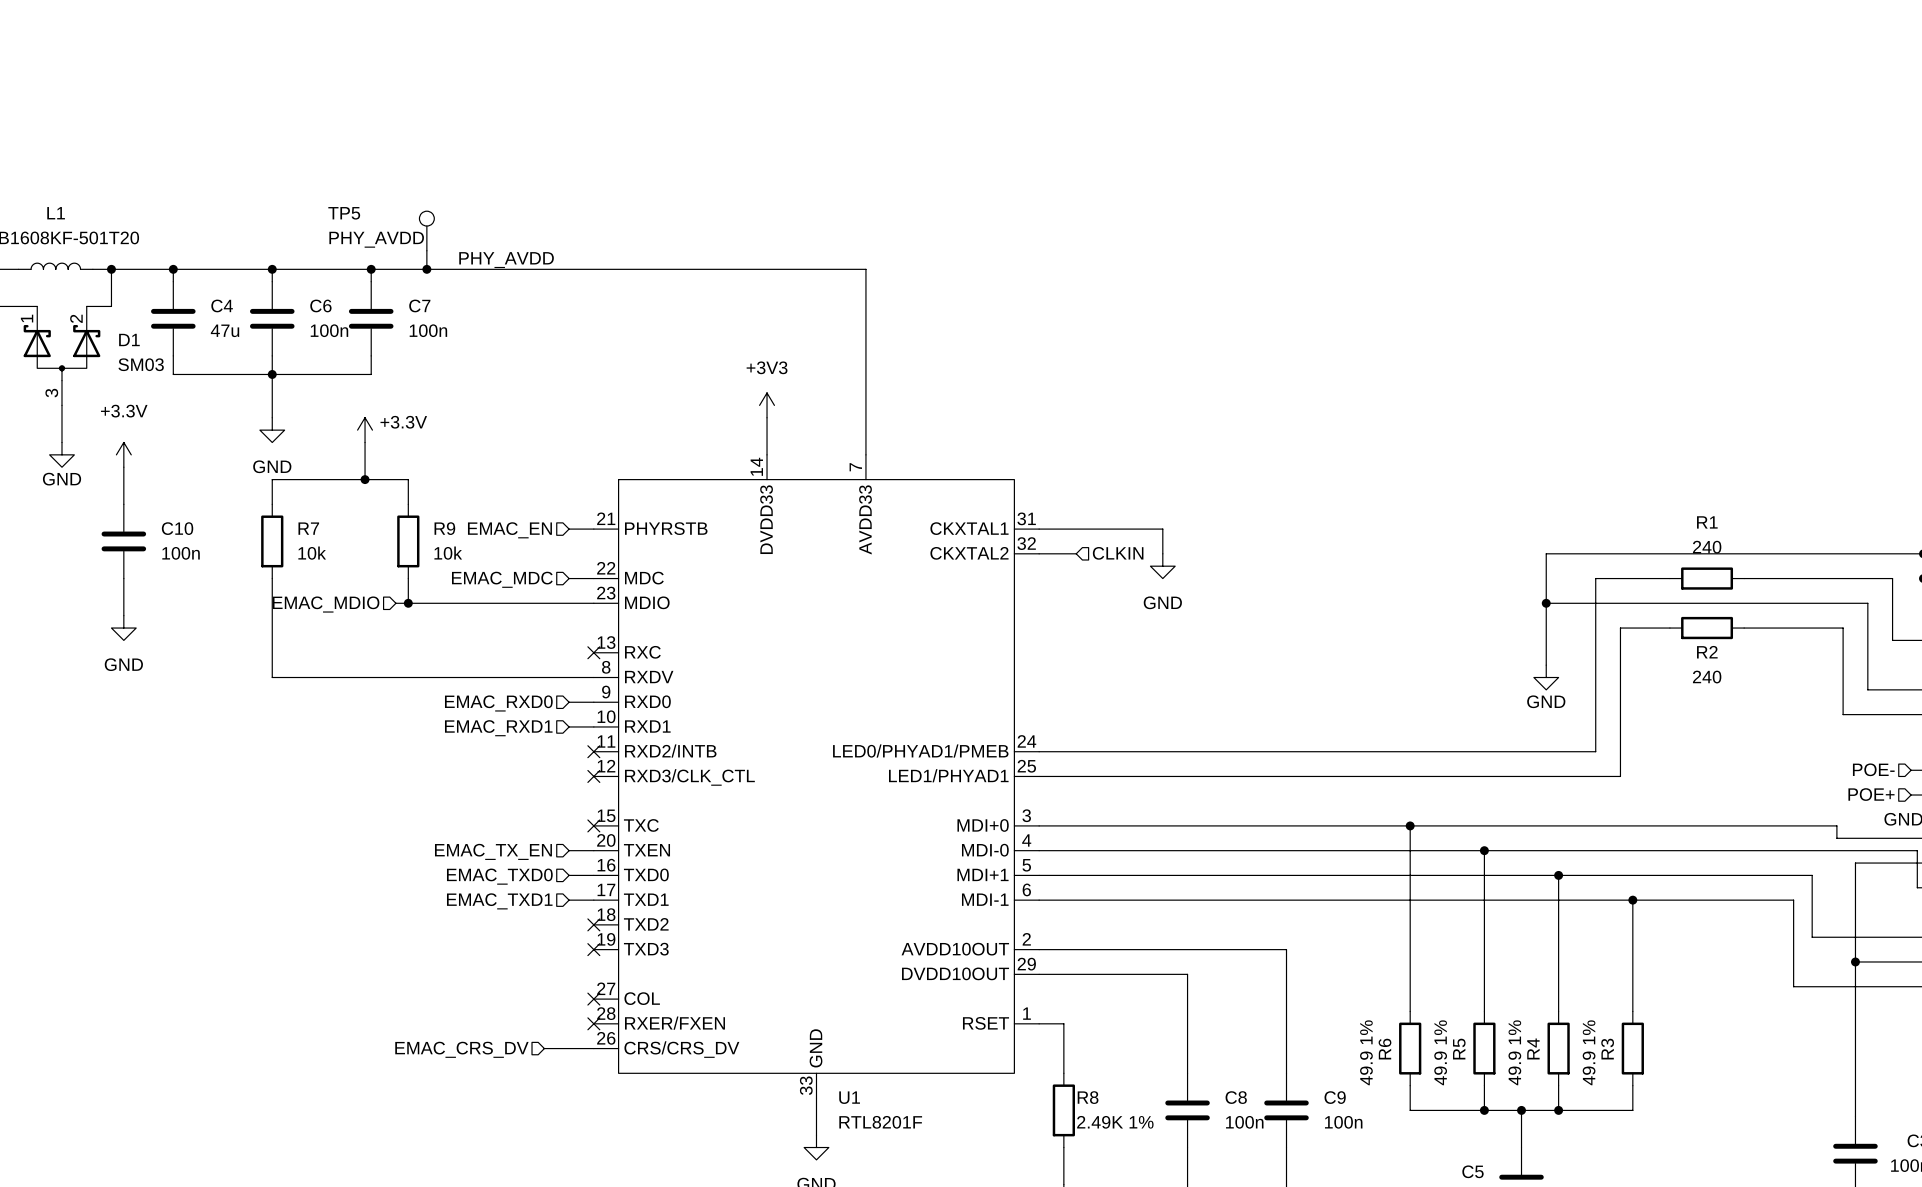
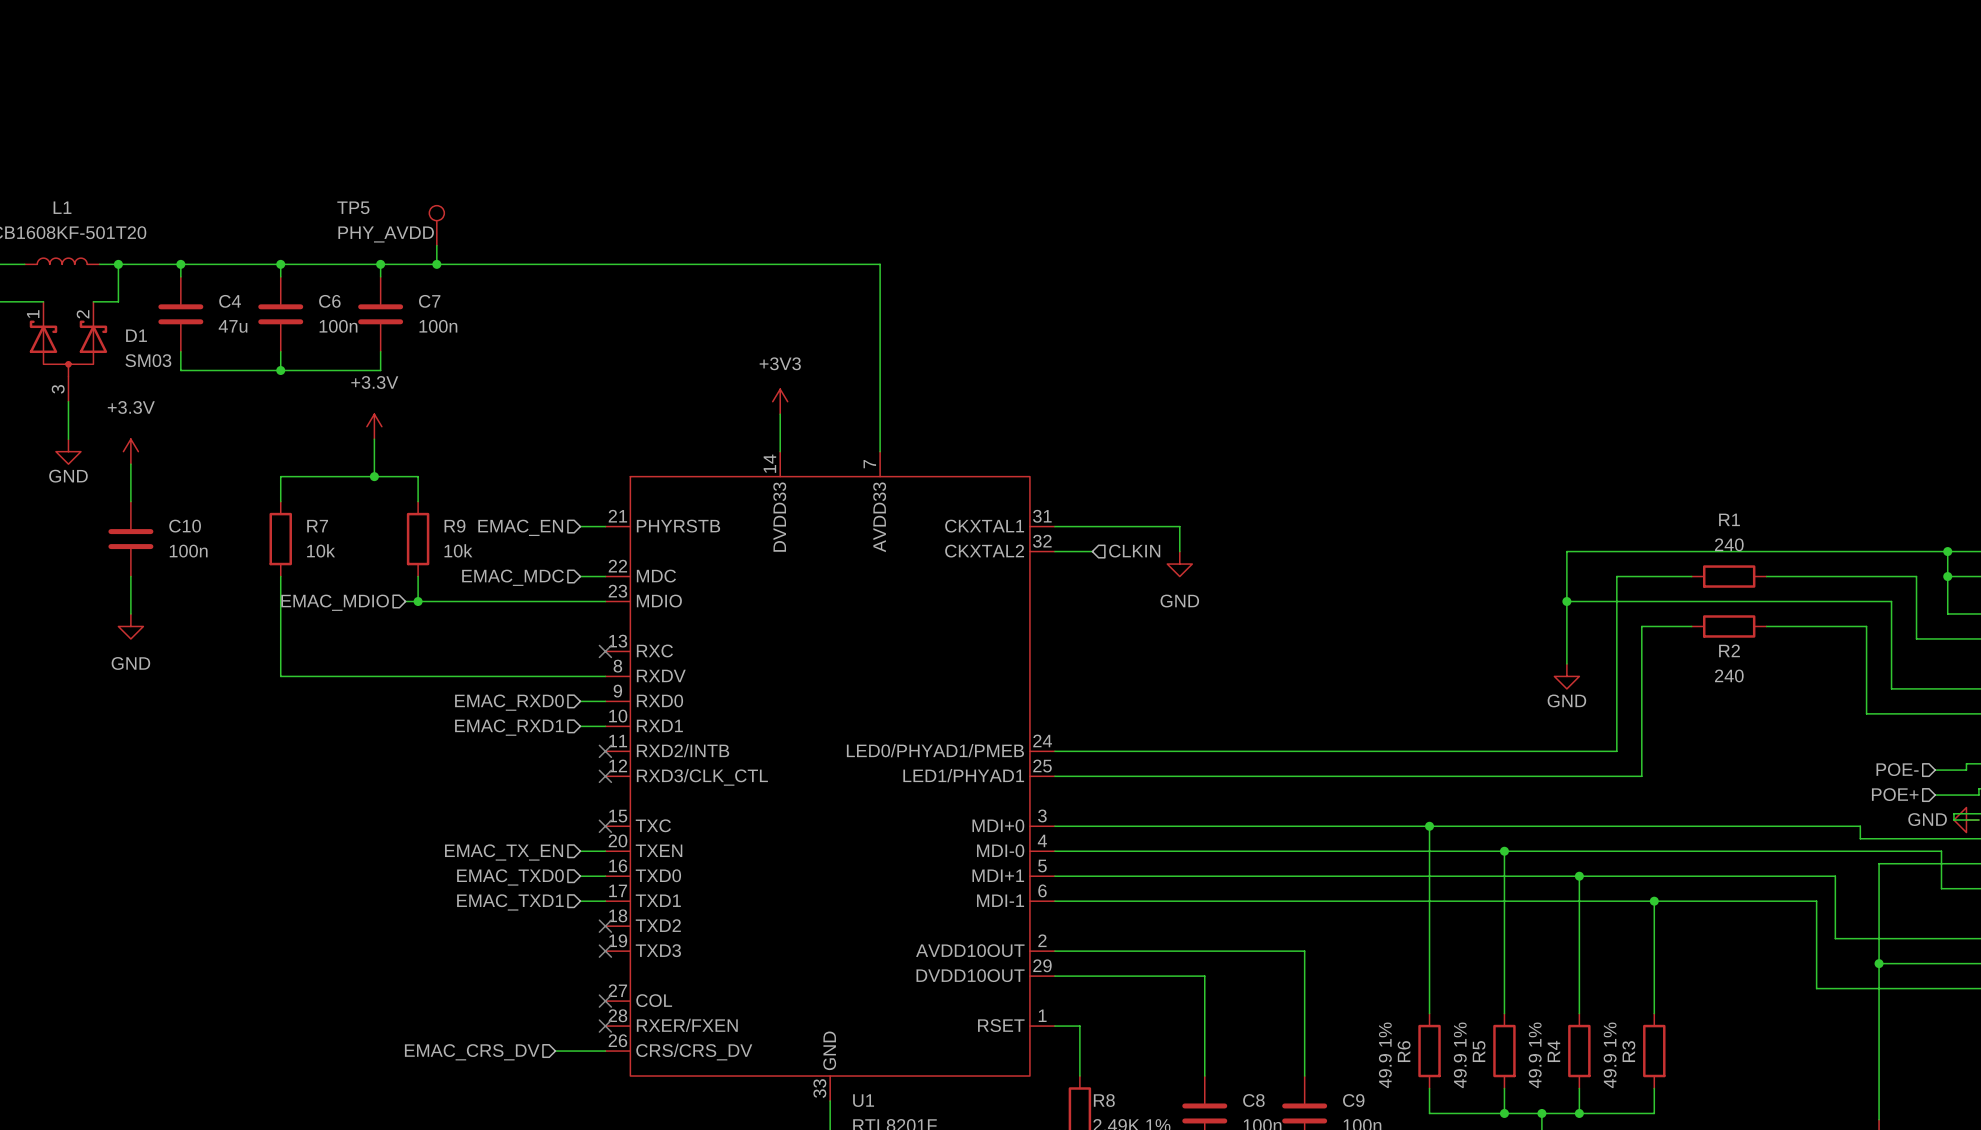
label: PHY_AVDD (506, 260) -> none
wire: (272, 374) (272, 417) -> none
power symbol text position: +3.3V (403, 422) -> +3.3V (374, 382)
power symbol: GND (272, 430) -> none

